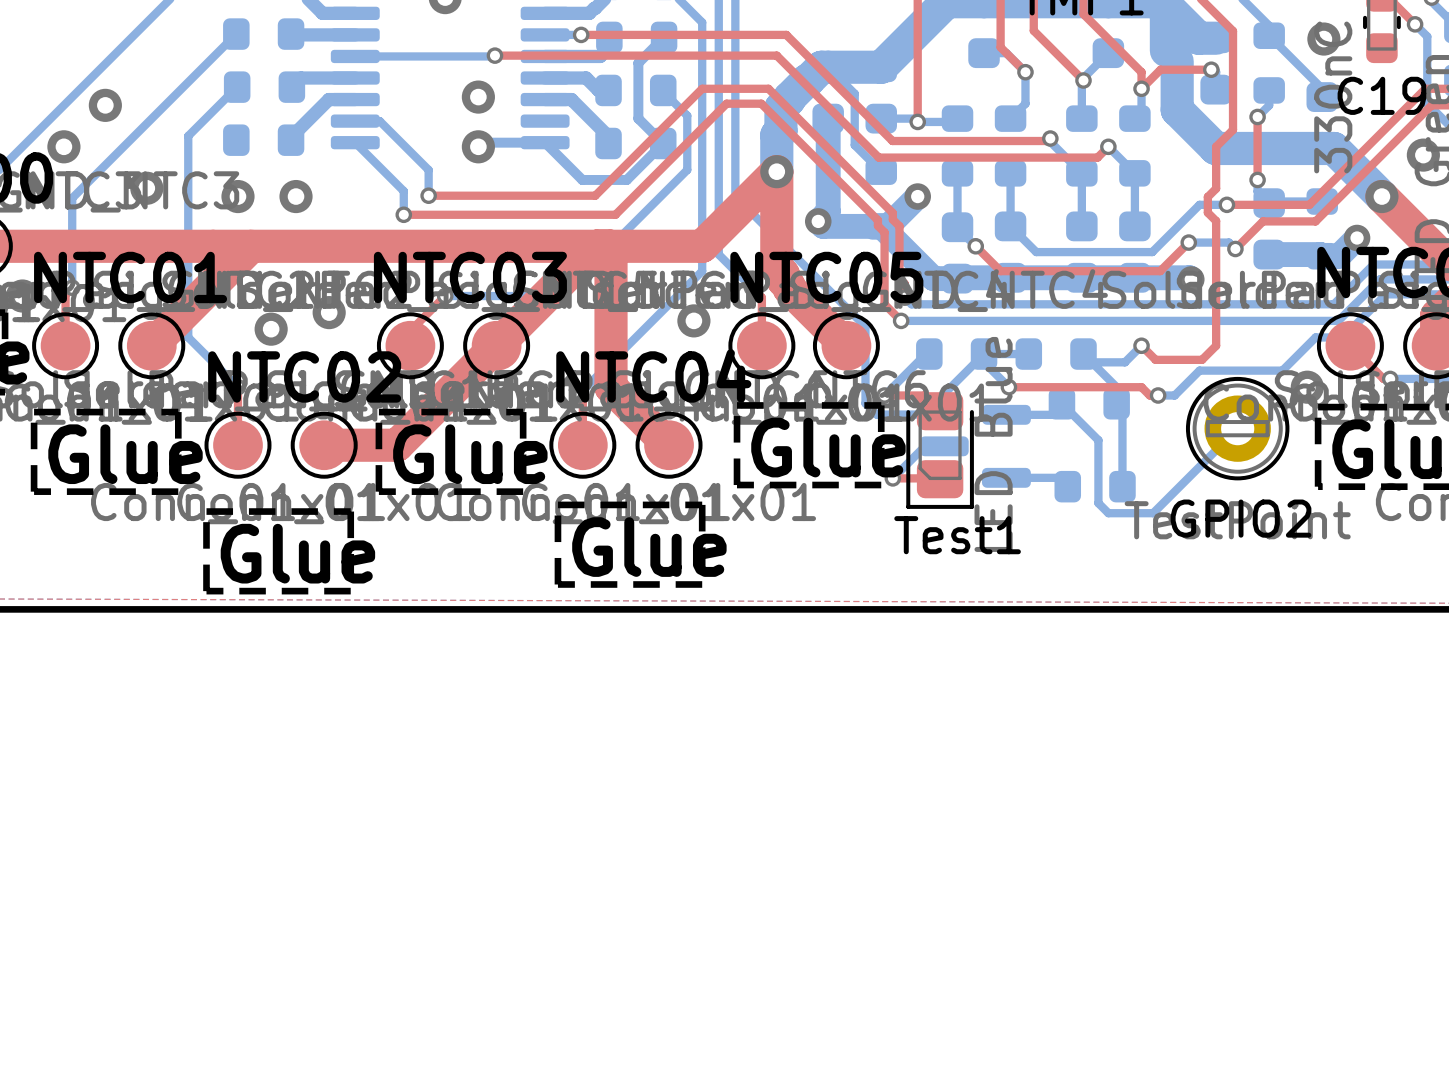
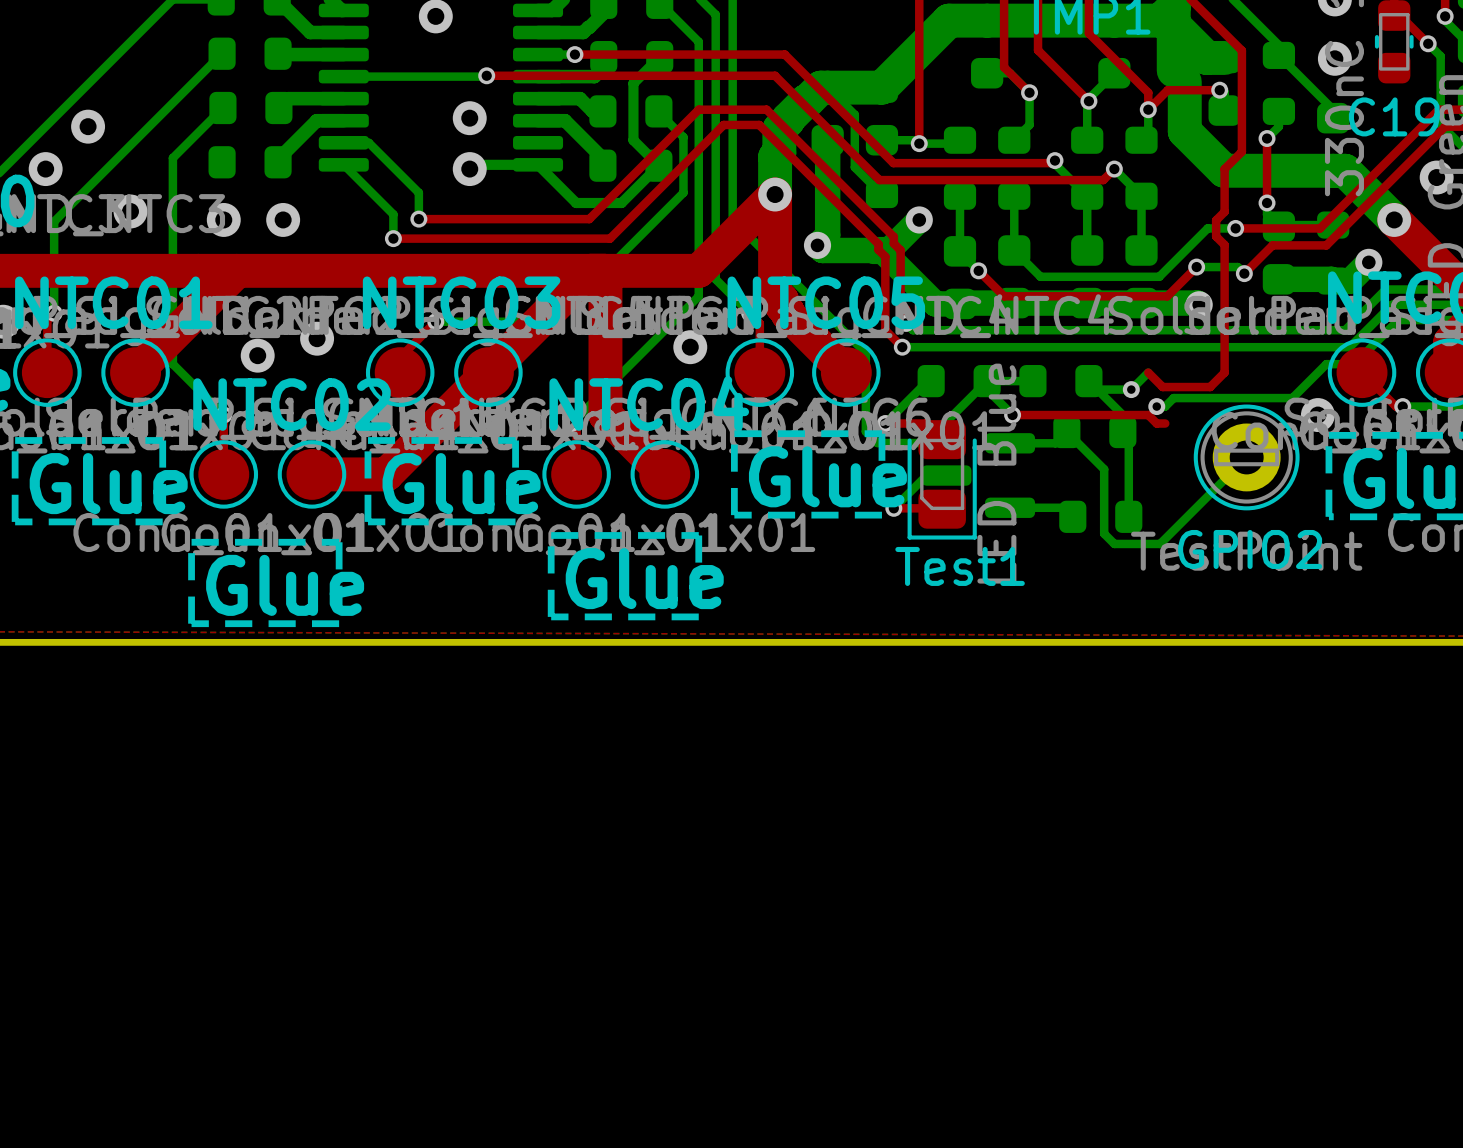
via position: (1141, 345) -> (1131, 389)
bottom track: (1199, 370) (1174, 395) (1158, 395) -> (1207, 398) (1173, 398) (1165, 406) (1156, 406)
via position: (1158, 395) -> (1156, 406)

